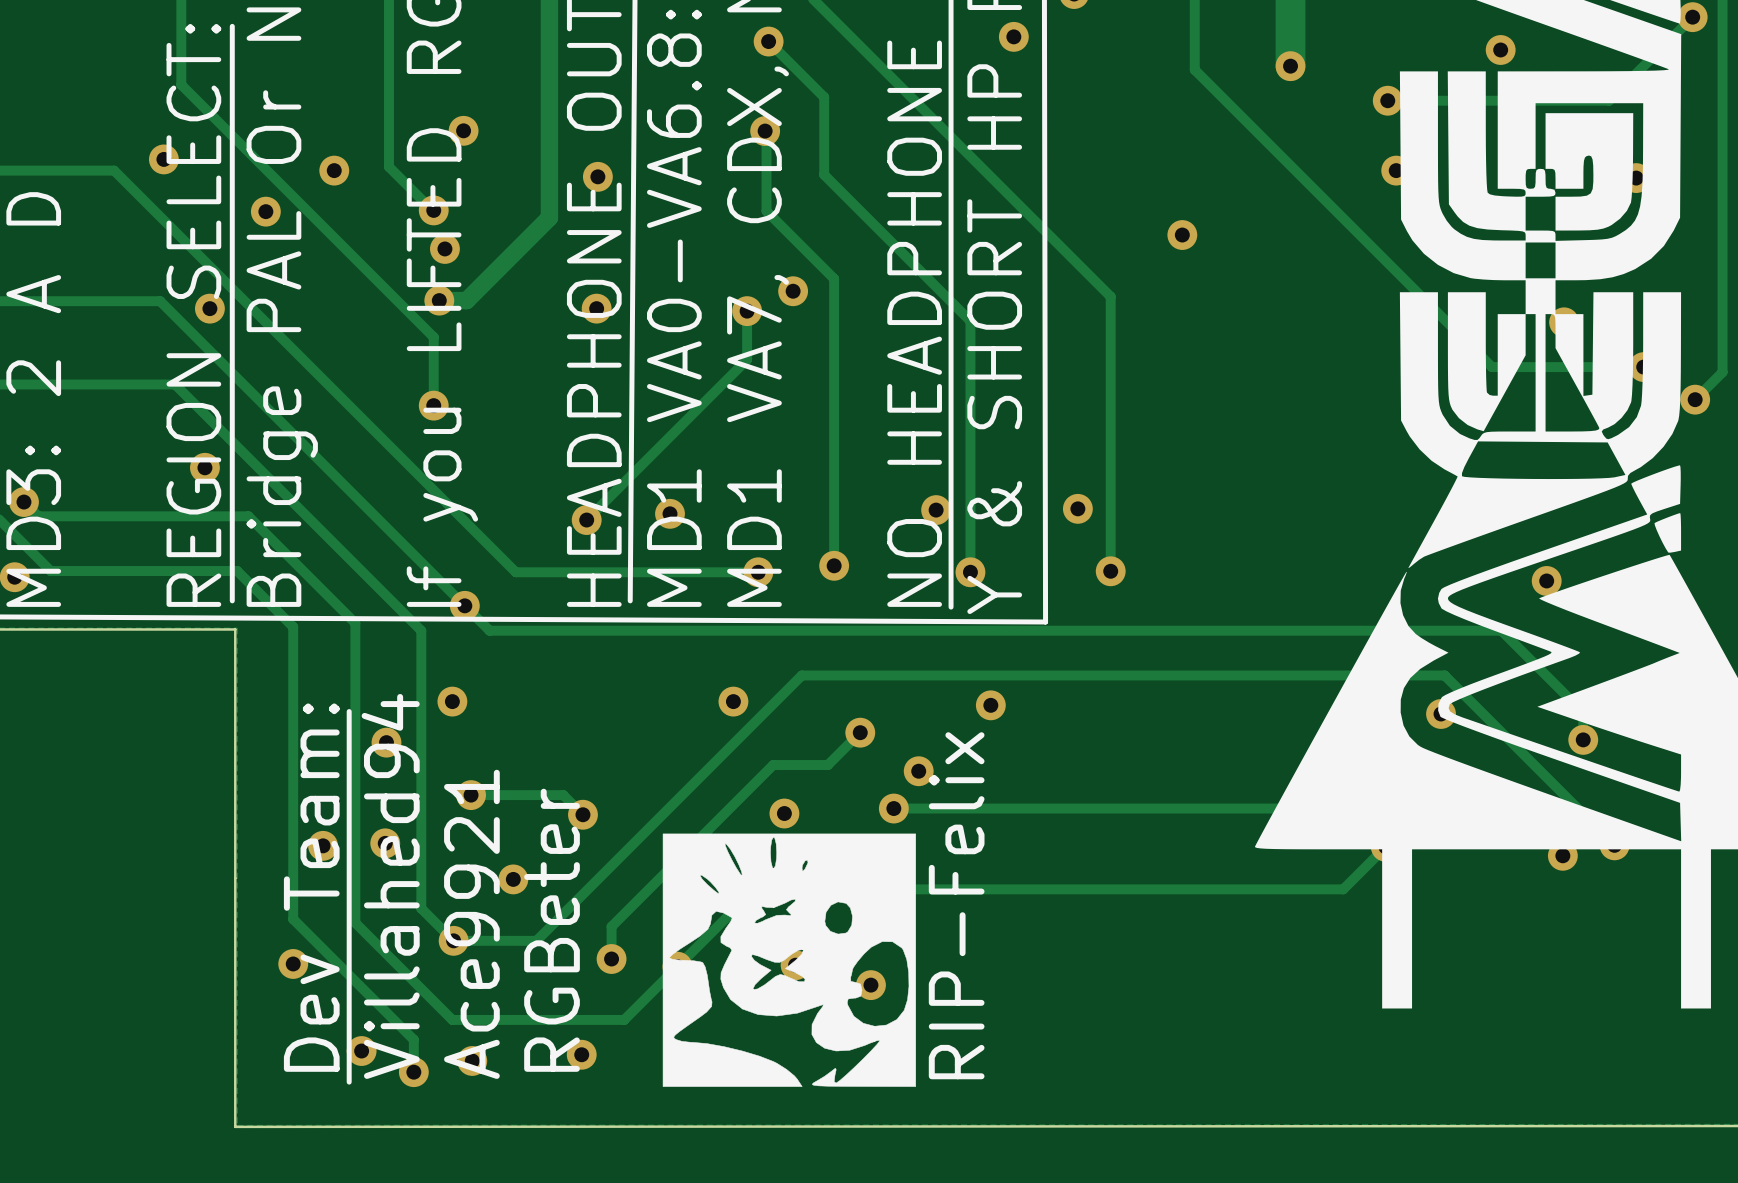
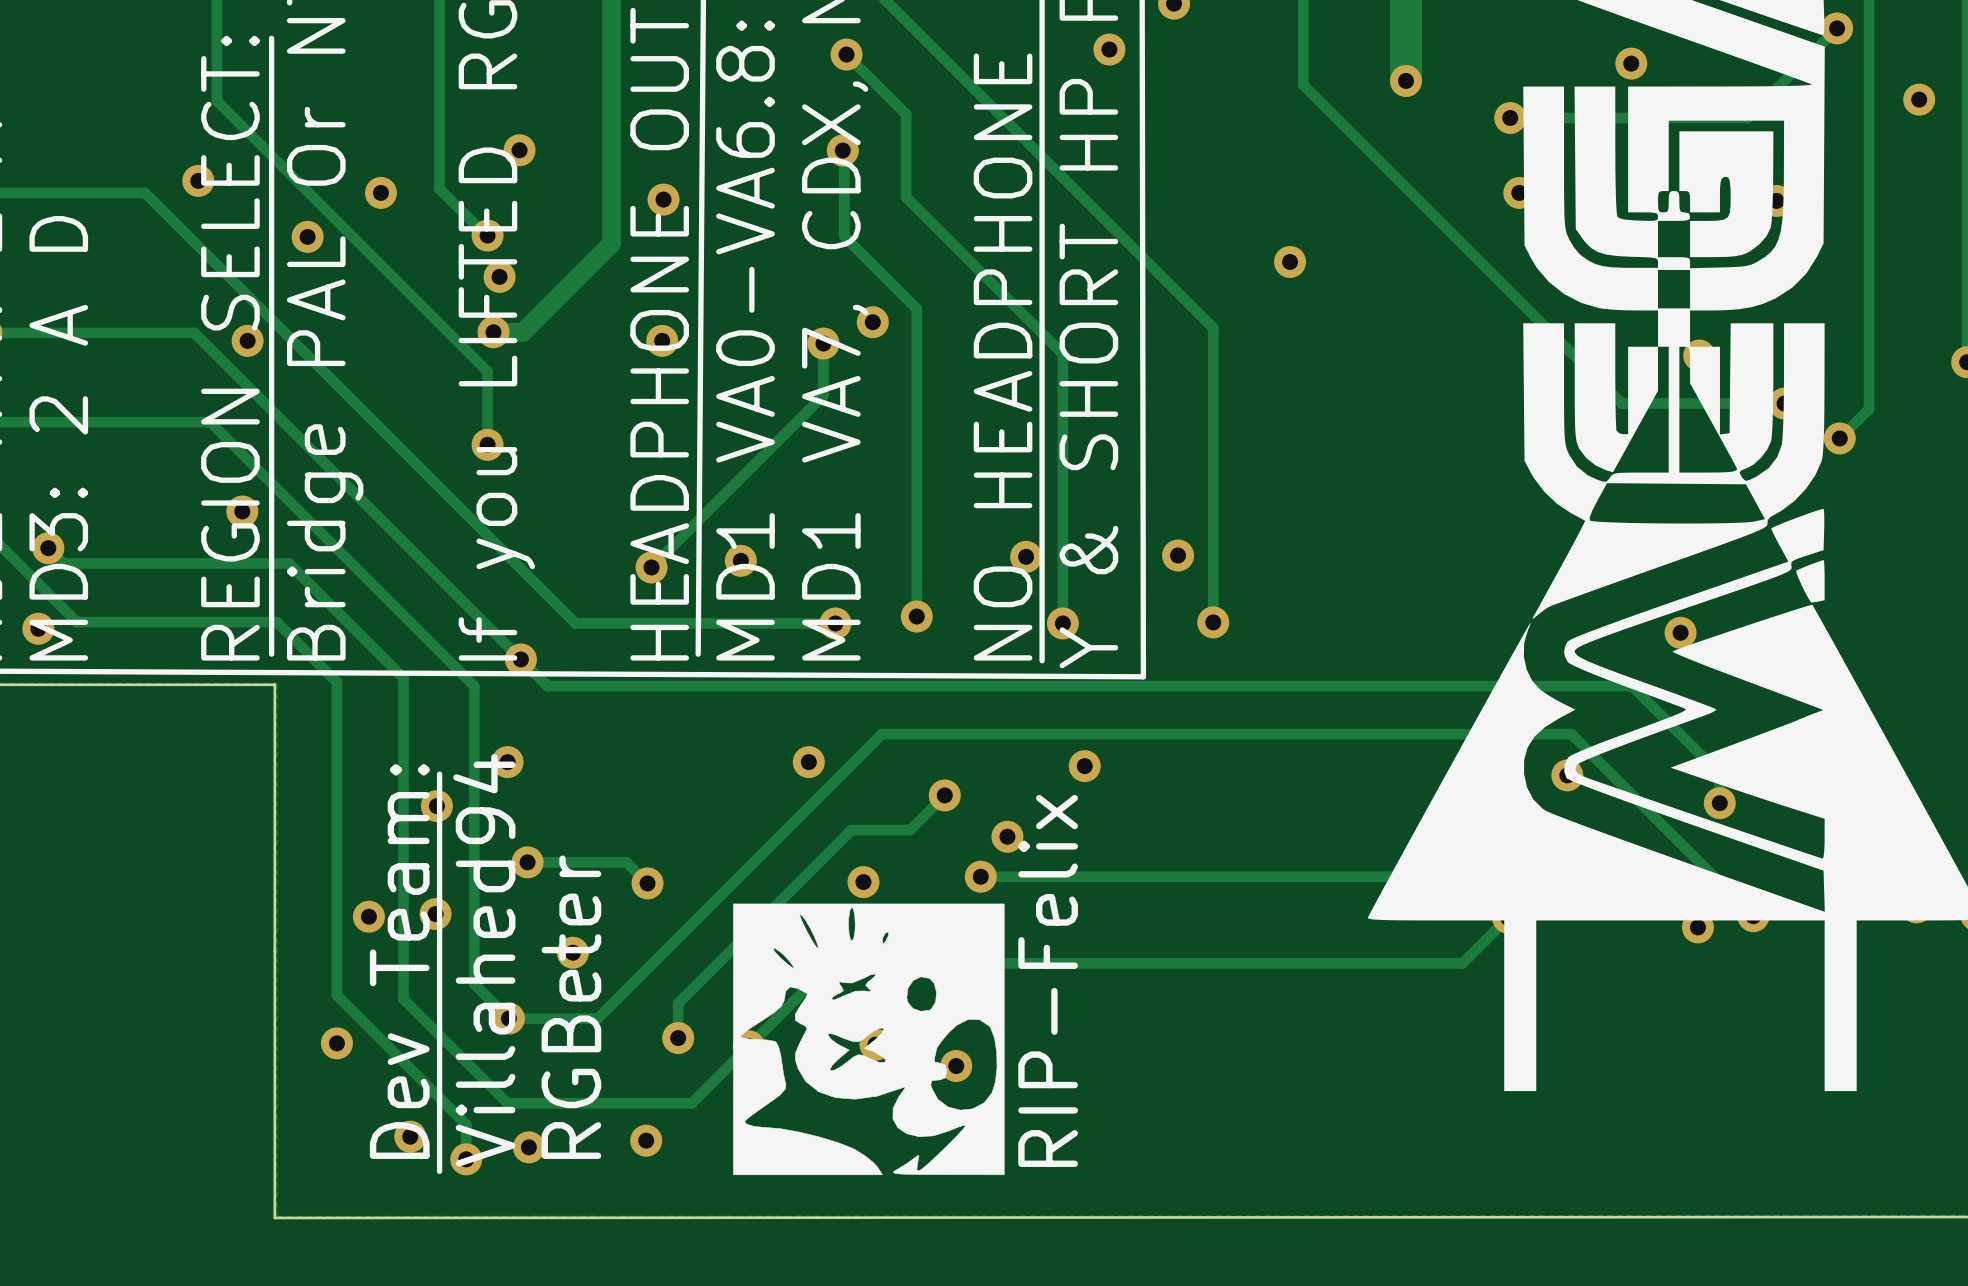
line: (349, 711) (349, 1082) -> (439, 774) (439, 1171)
text position: Villahed94 (390, 886) -> Villahed94 (484, 960)
text position: Dev Team: (311, 887) -> Dev Team: (399, 961)
text: Ace9921 (471, 924) -> none
text position: RGBeter (552, 930) -> RGBeter (571, 1007)

